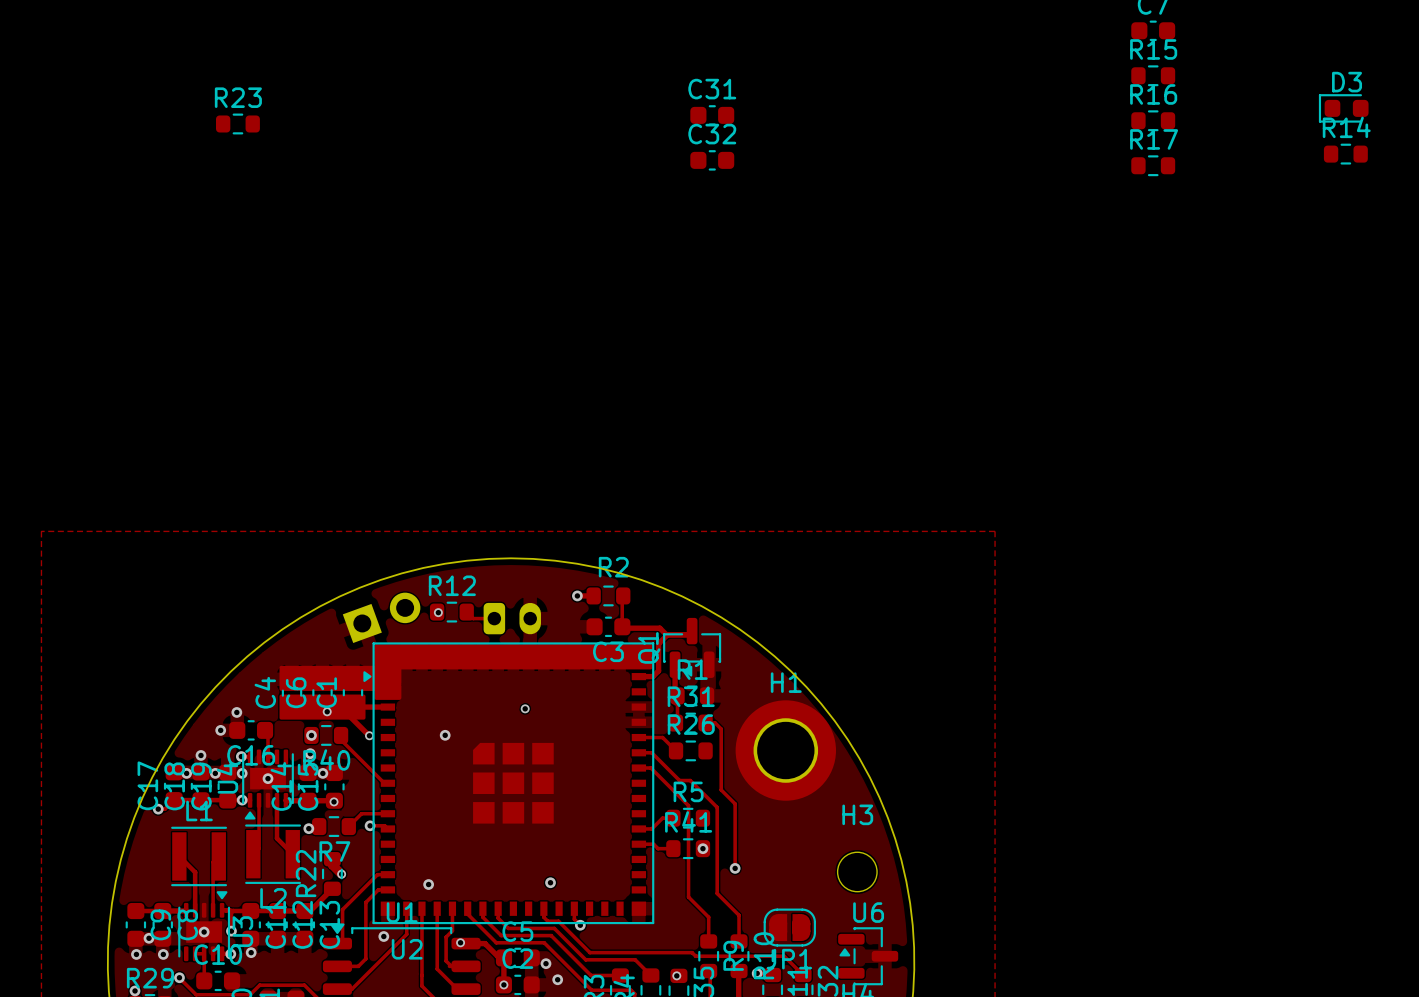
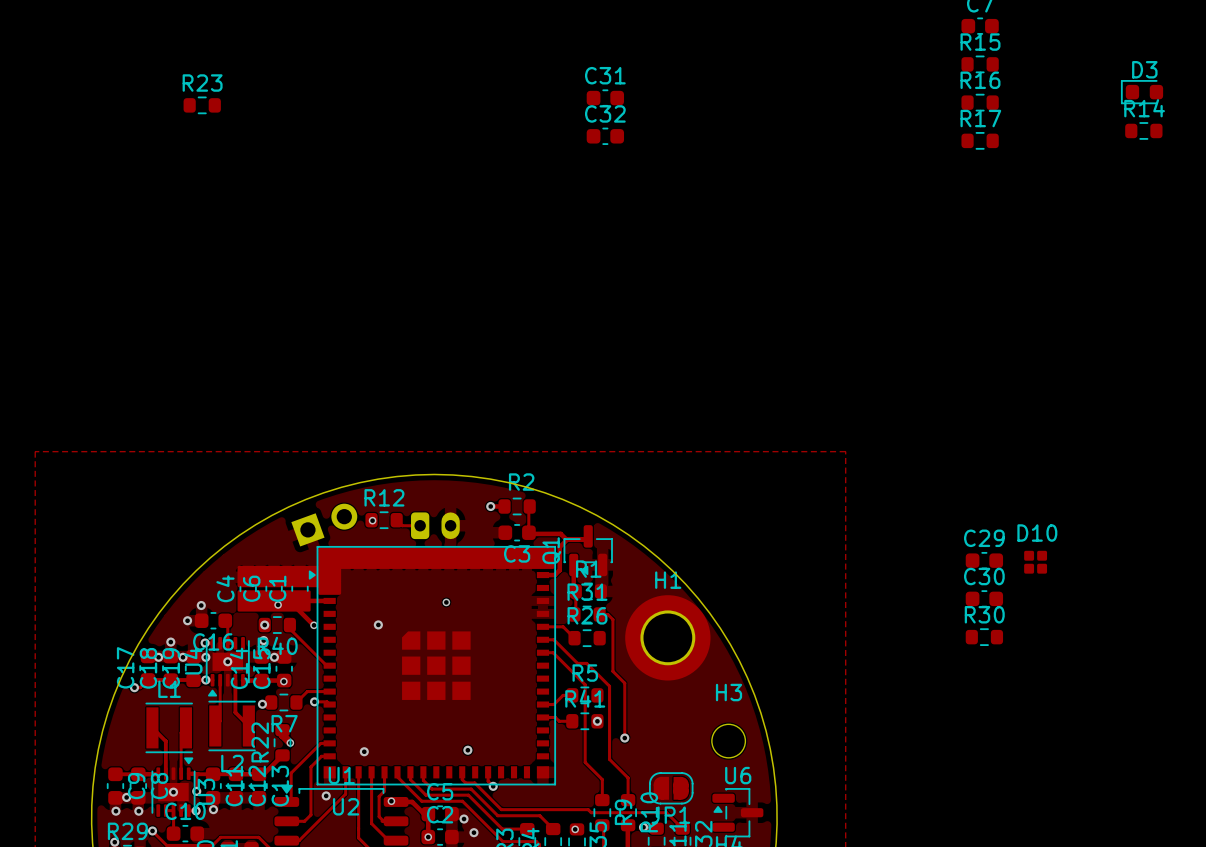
C29: none -> (984, 560)
D10: none -> (1035, 562)
C30: none -> (984, 598)
R30: none -> (984, 637)

